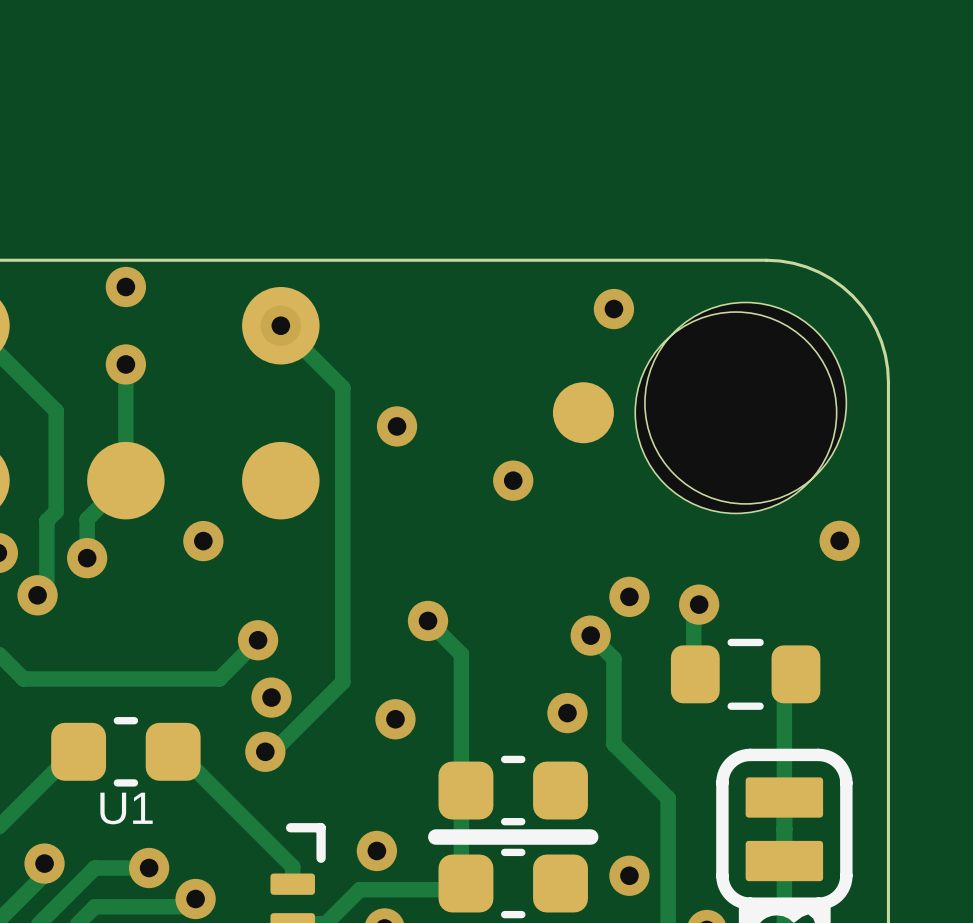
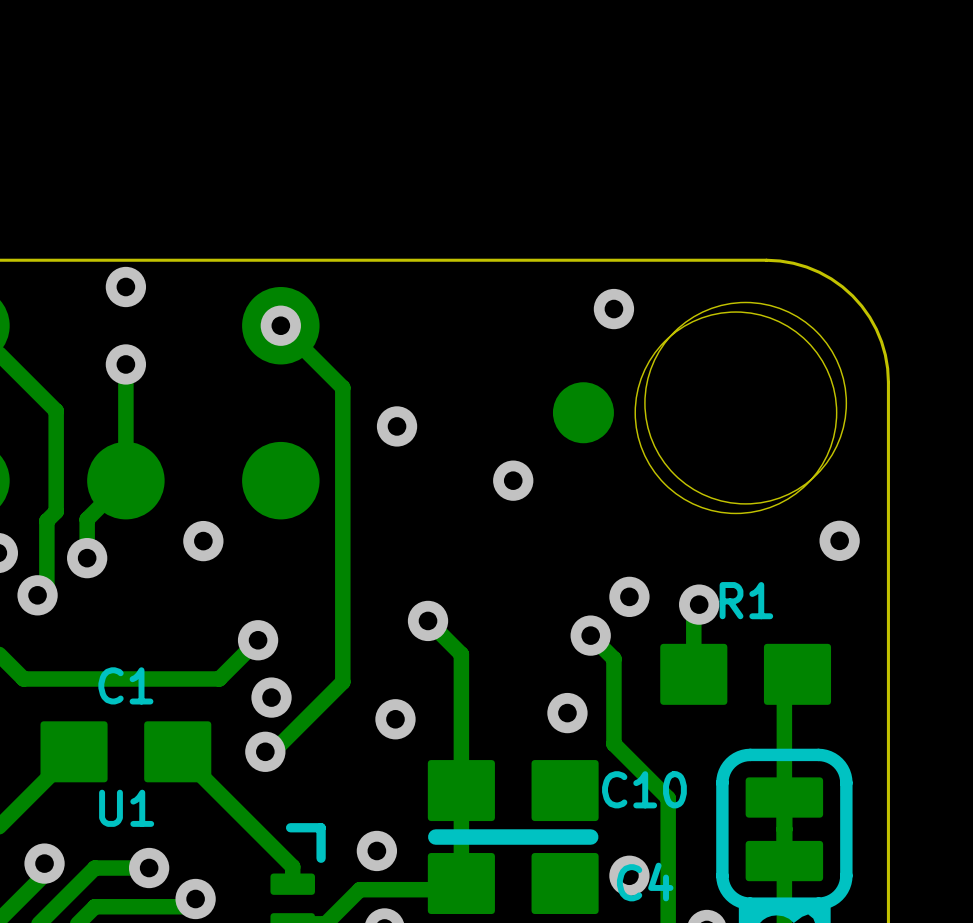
part: (745, 674) -> none
R1: none -> (745, 674)
part: (125, 751) -> none
C1: none -> (125, 751)
part: (513, 790) -> none
C10: none -> (513, 790)
part: (513, 883) -> none
C4: none -> (513, 883)

